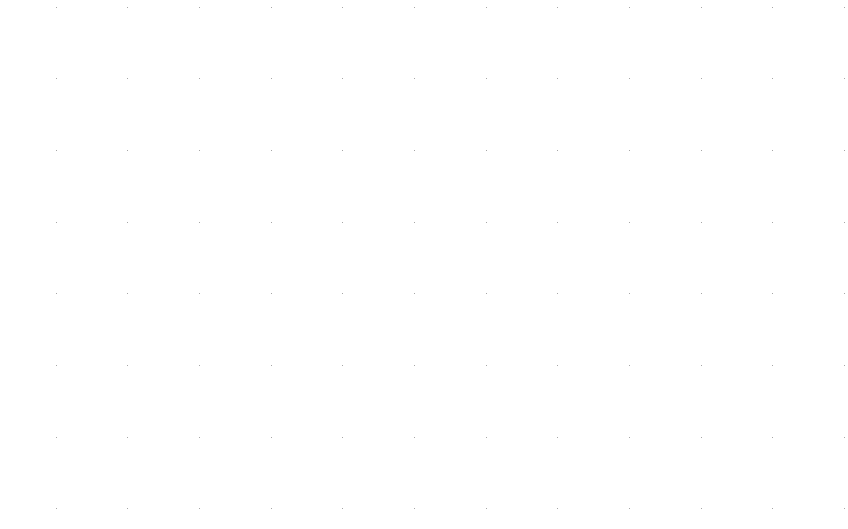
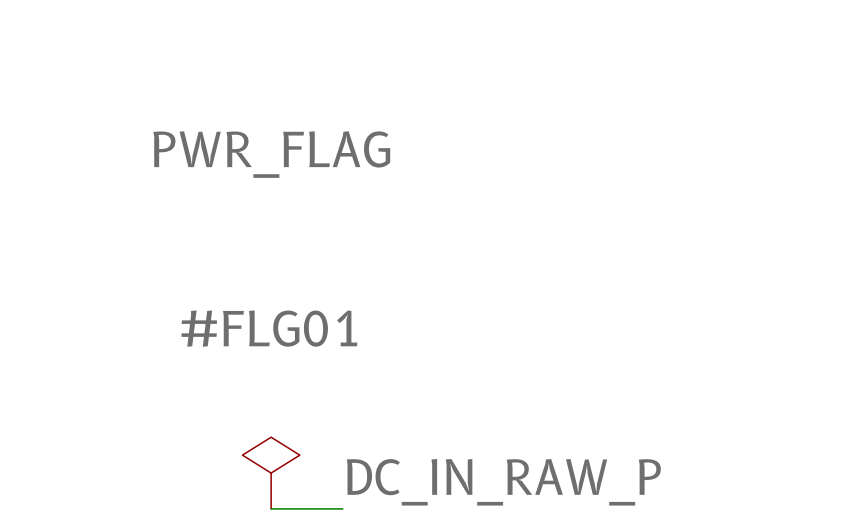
#FLG01: none -> PWR_FLAG (271, 473)
label: none -> DC_IN_RAW_P (503, 482)
wire: none -> (271, 508) (342, 508)

